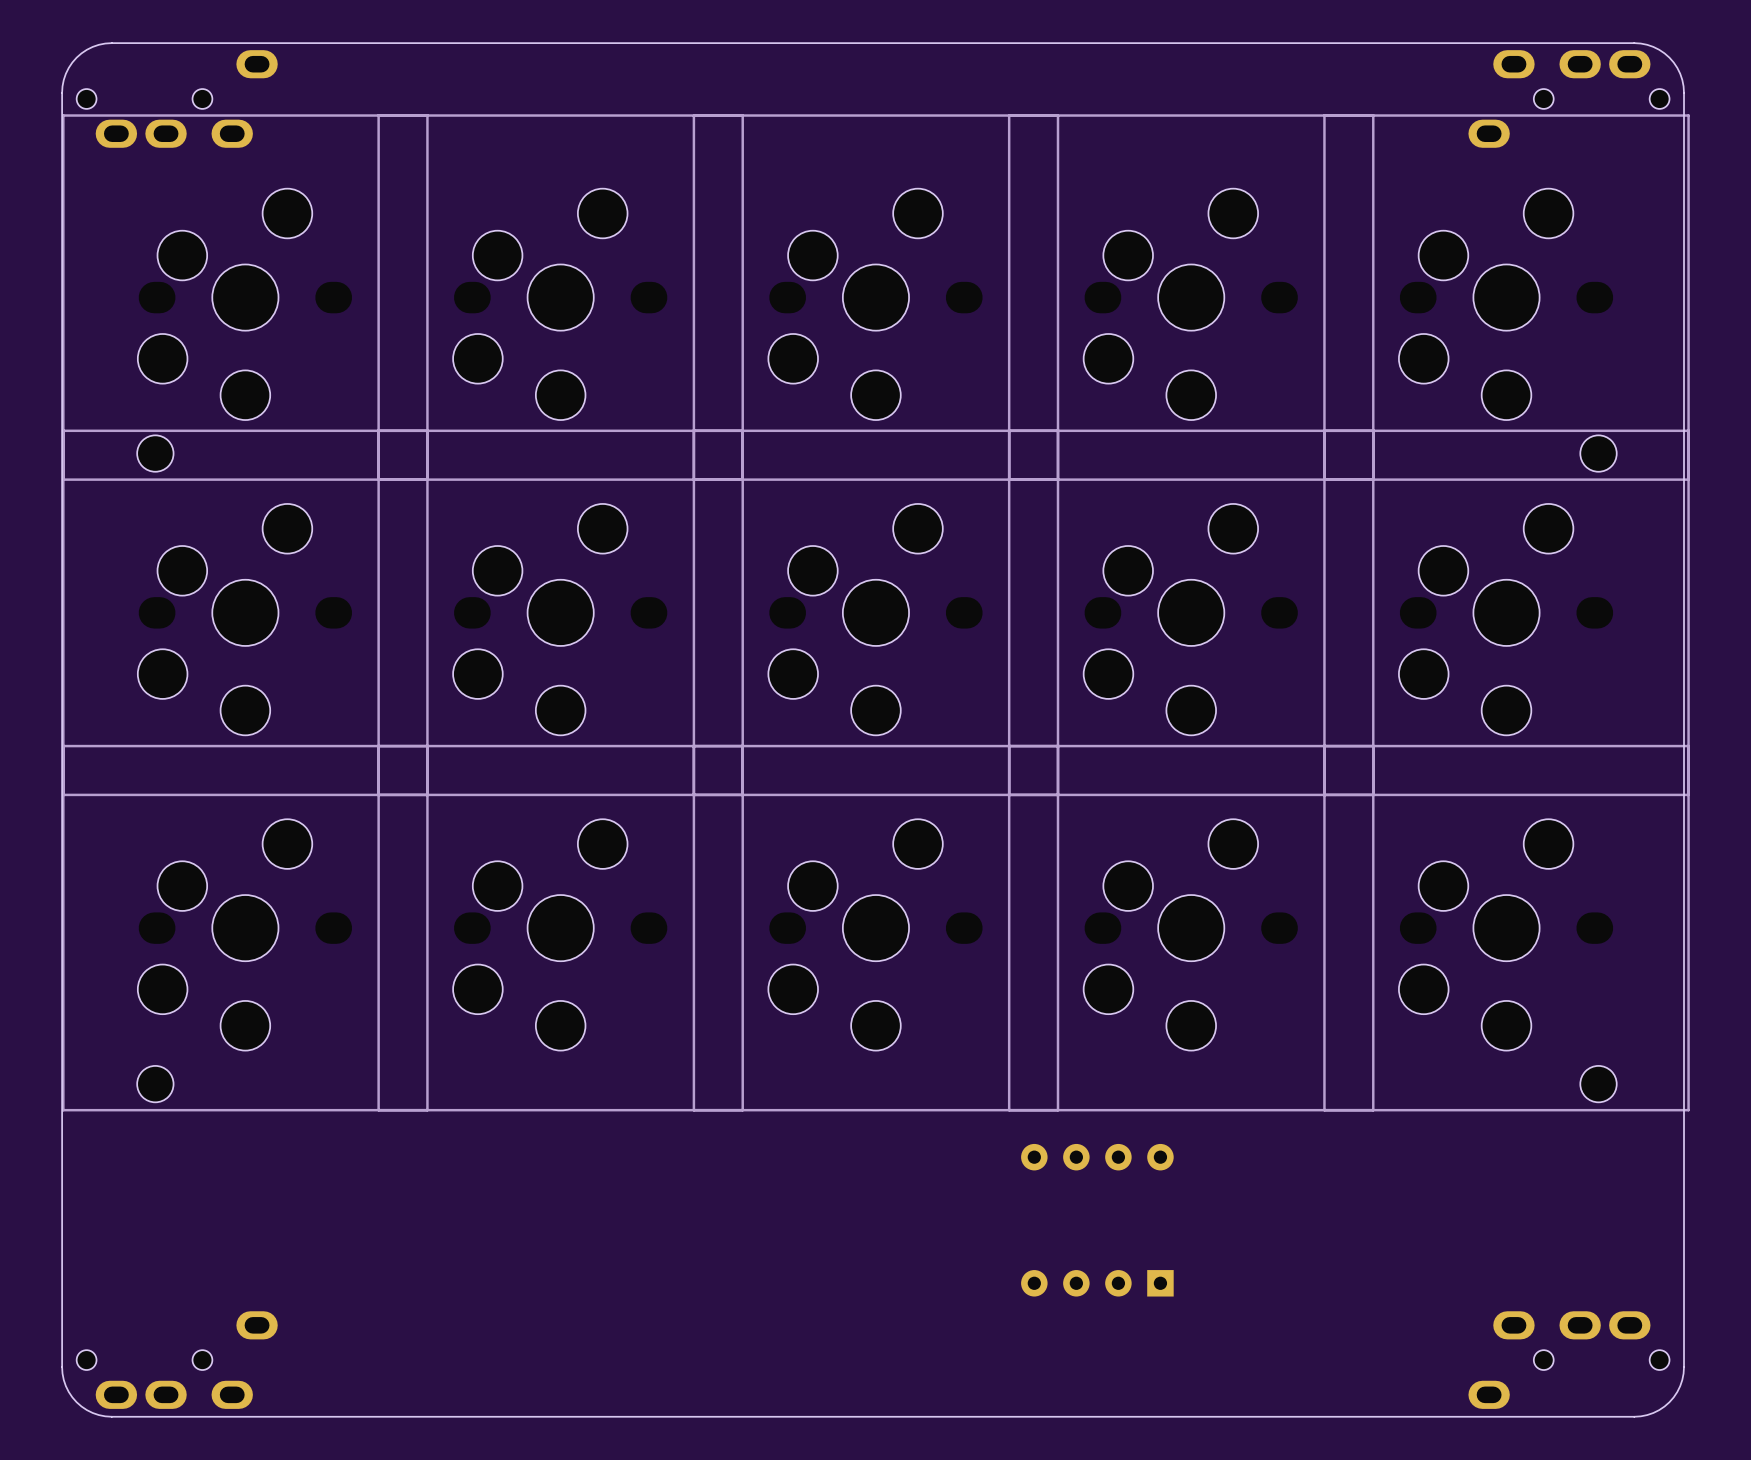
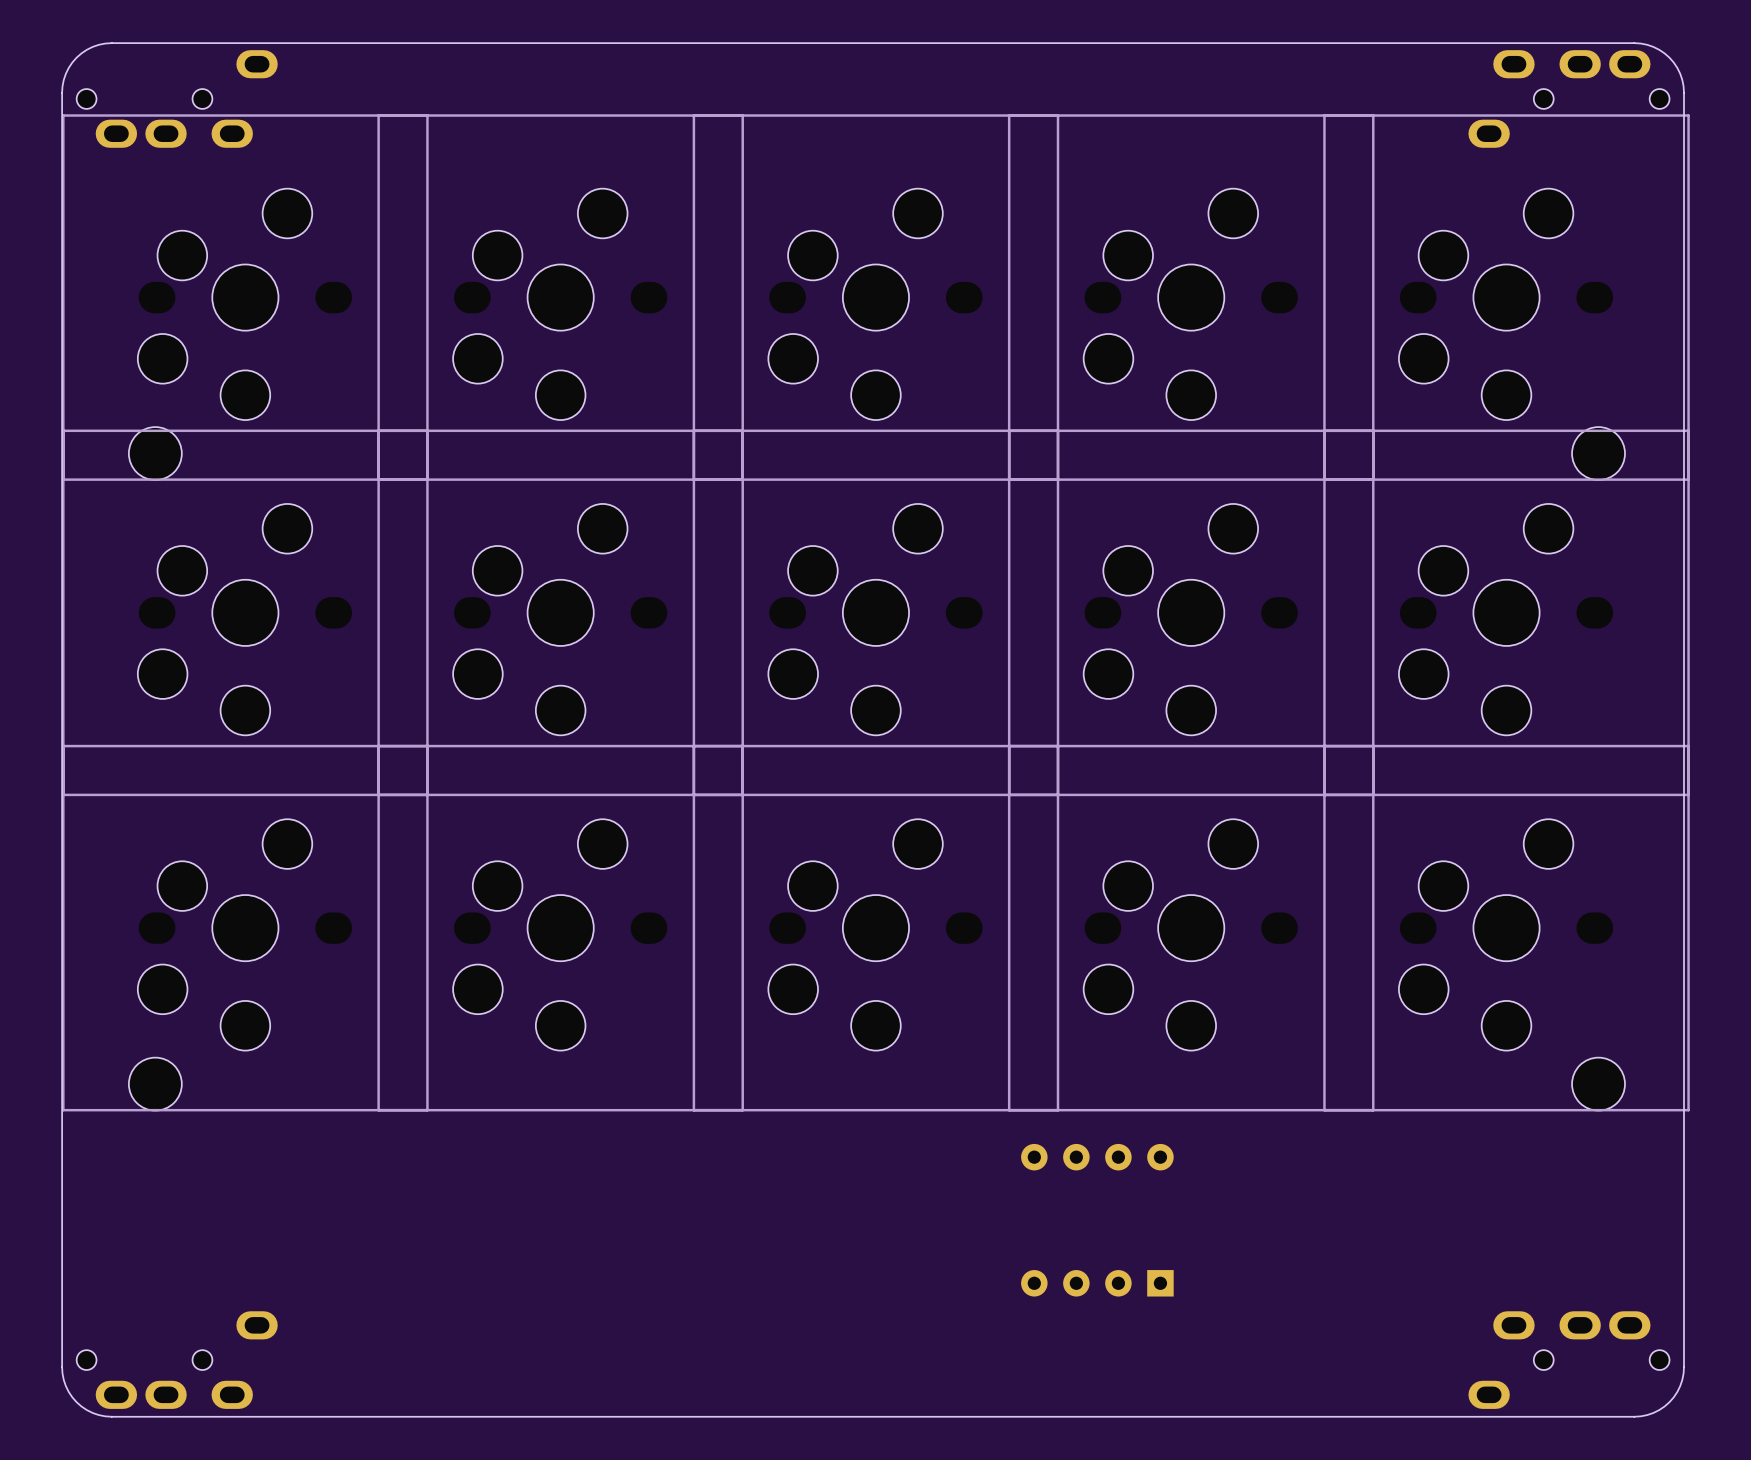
part footprint: [137, 435, 174, 472] -> [128, 427, 182, 481]
part footprint: [1580, 435, 1617, 472] -> [1572, 427, 1626, 481]
part footprint: [137, 1065, 174, 1103] -> [128, 1057, 182, 1111]
part footprint: [1580, 1065, 1617, 1103] -> [1572, 1057, 1626, 1111]

